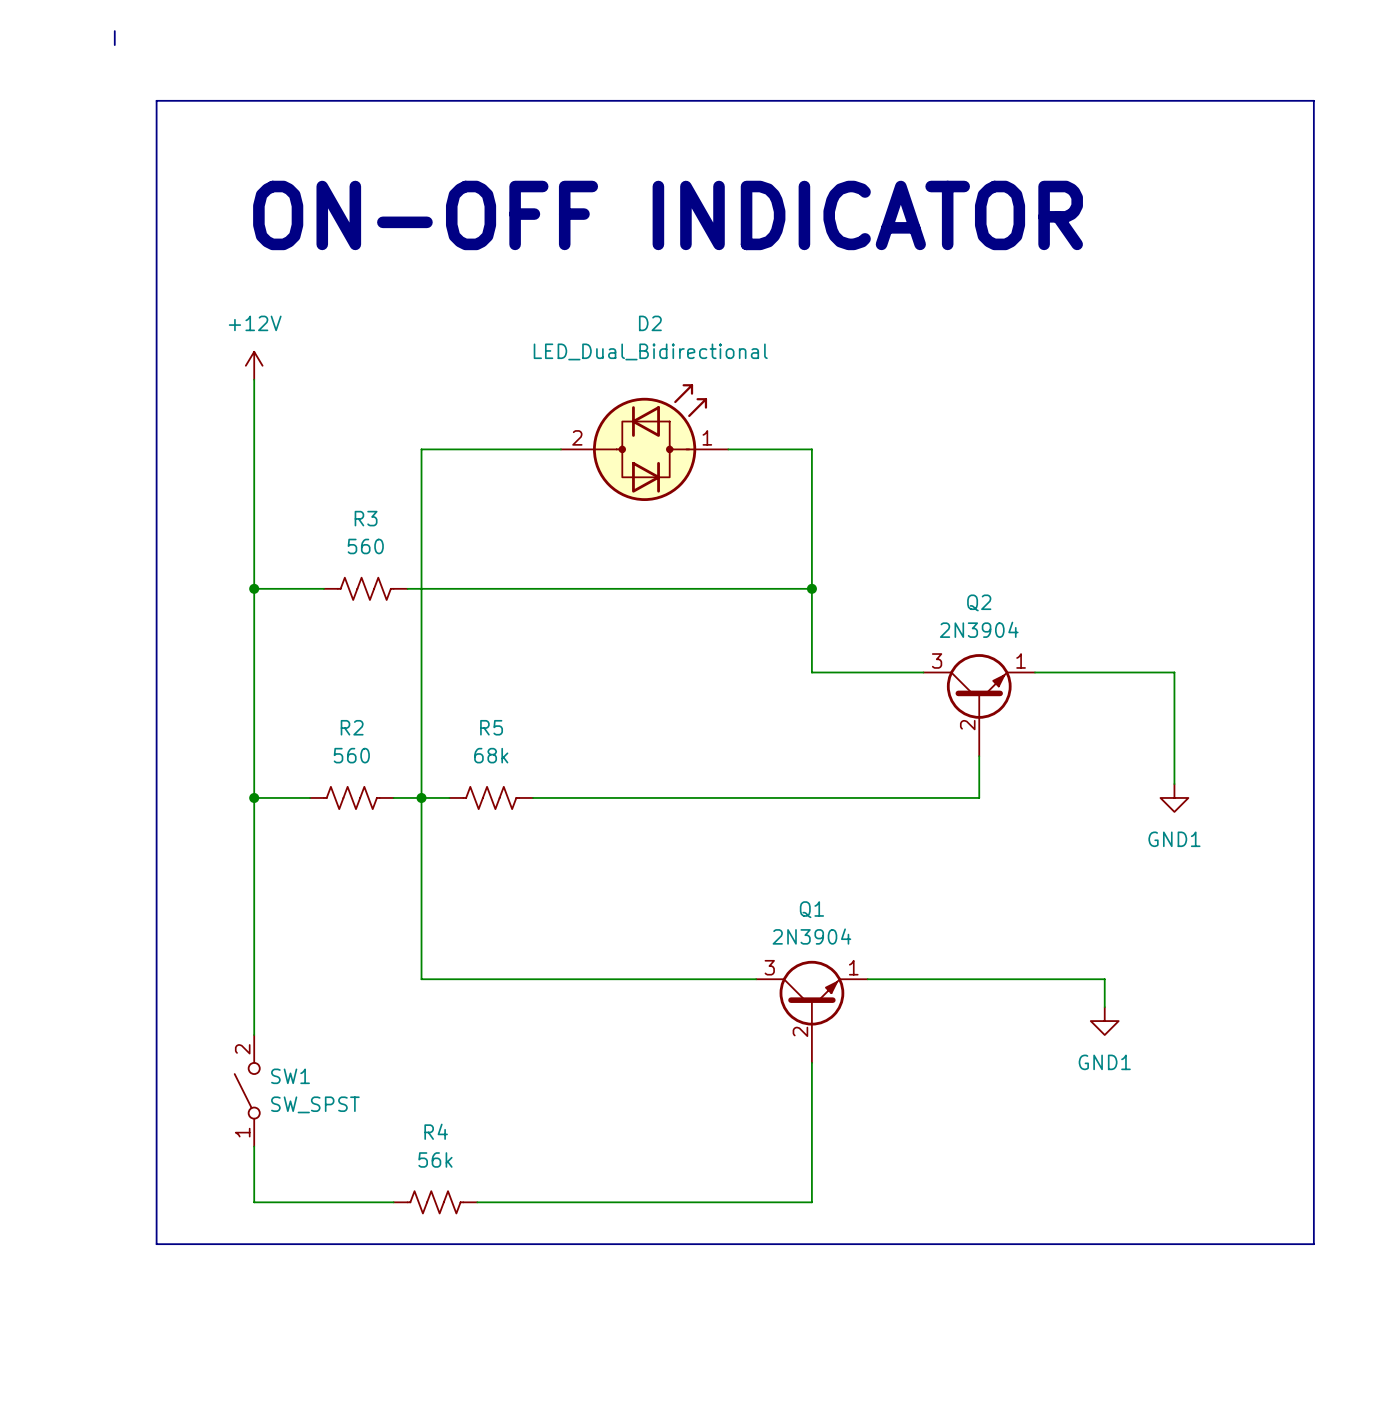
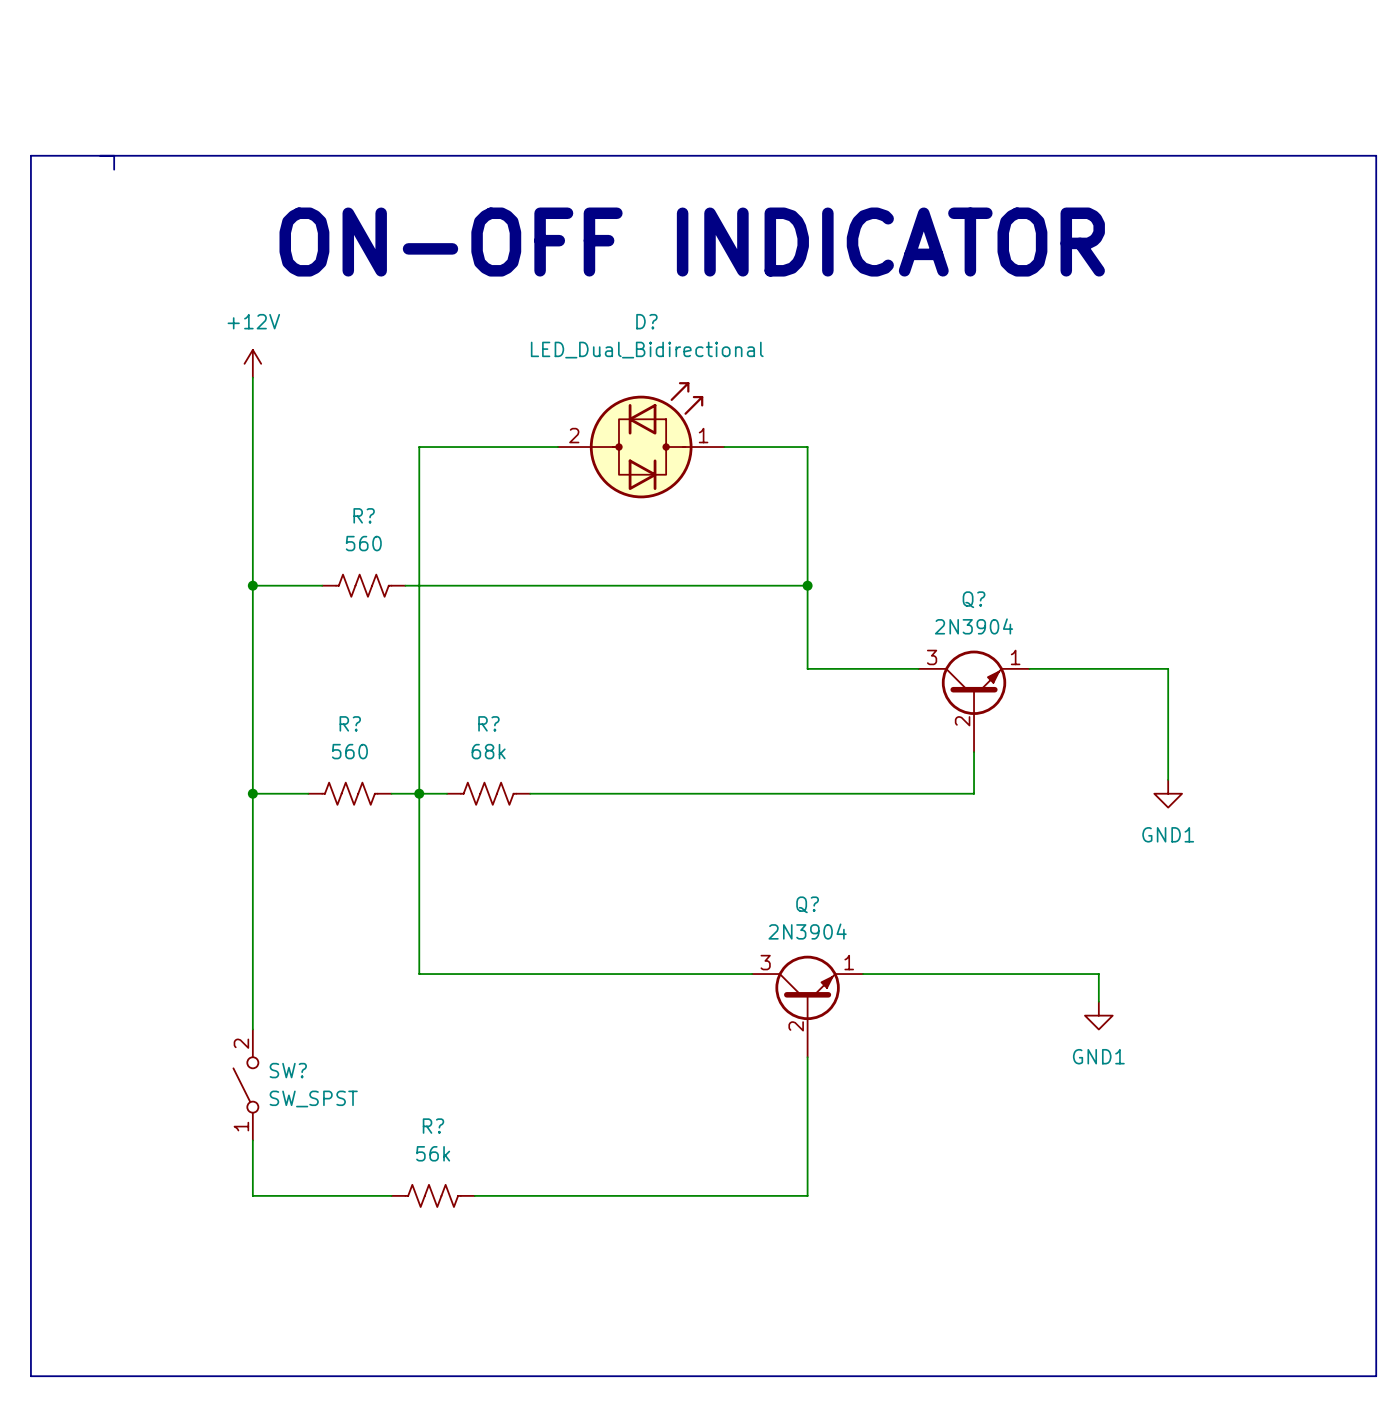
line: (114, 31) (114, 45) -> (114, 155) (114, 169)
line: (156, 100) (1313, 100) (1313, 1244) (156, 1244) (156, 100) -> (30, 155) (30, 1376) (1376, 1376) (1376, 155) (30, 155)
text position: ON-OFF INDICATOR (668, 215) -> ON-OFF INDICATOR (692, 242)
D2 name: D2 (650, 323) -> D? (646, 321)
R3 name: R3 (366, 518) -> R? (364, 515)
Q2 name: Q2 (979, 602) -> Q? (974, 599)
R2 name: R2 (352, 727) -> R? (350, 723)
R5 name: R5 (491, 727) -> R? (488, 723)
Q1 name: Q1 (811, 909) -> Q? (807, 904)
SW1 name: SW1 (290, 1076) -> SW? (288, 1070)
R4 name: R4 (436, 1131) -> R? (433, 1126)

